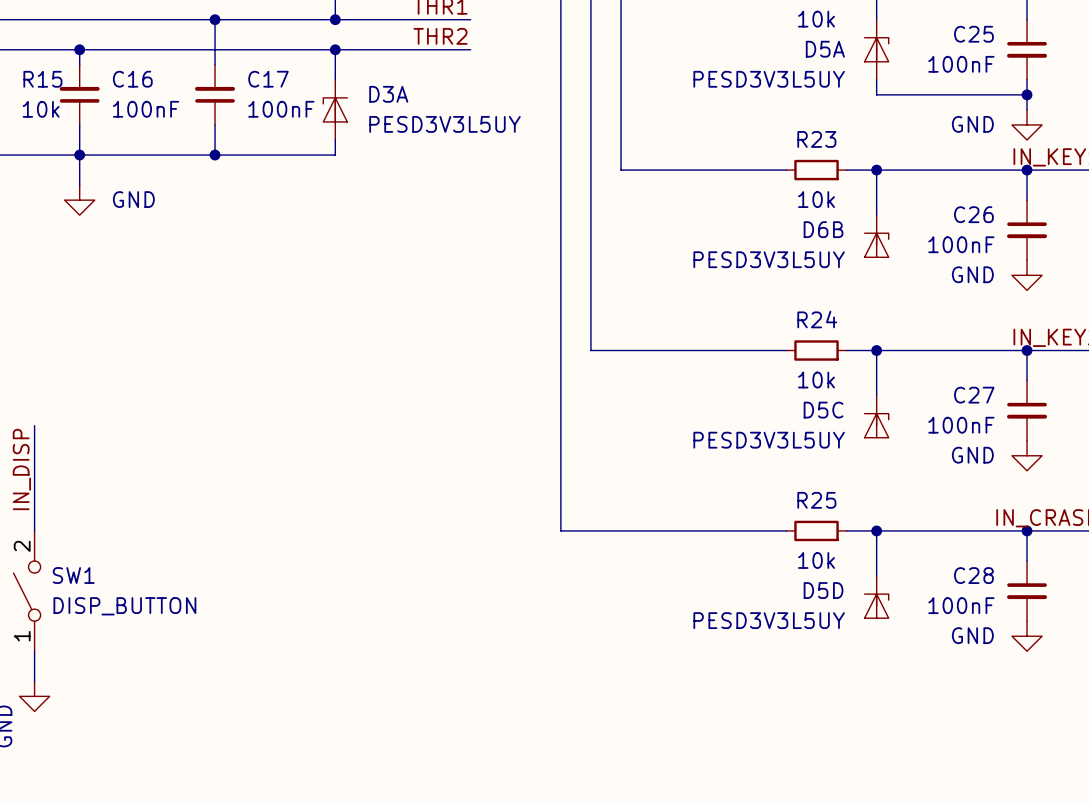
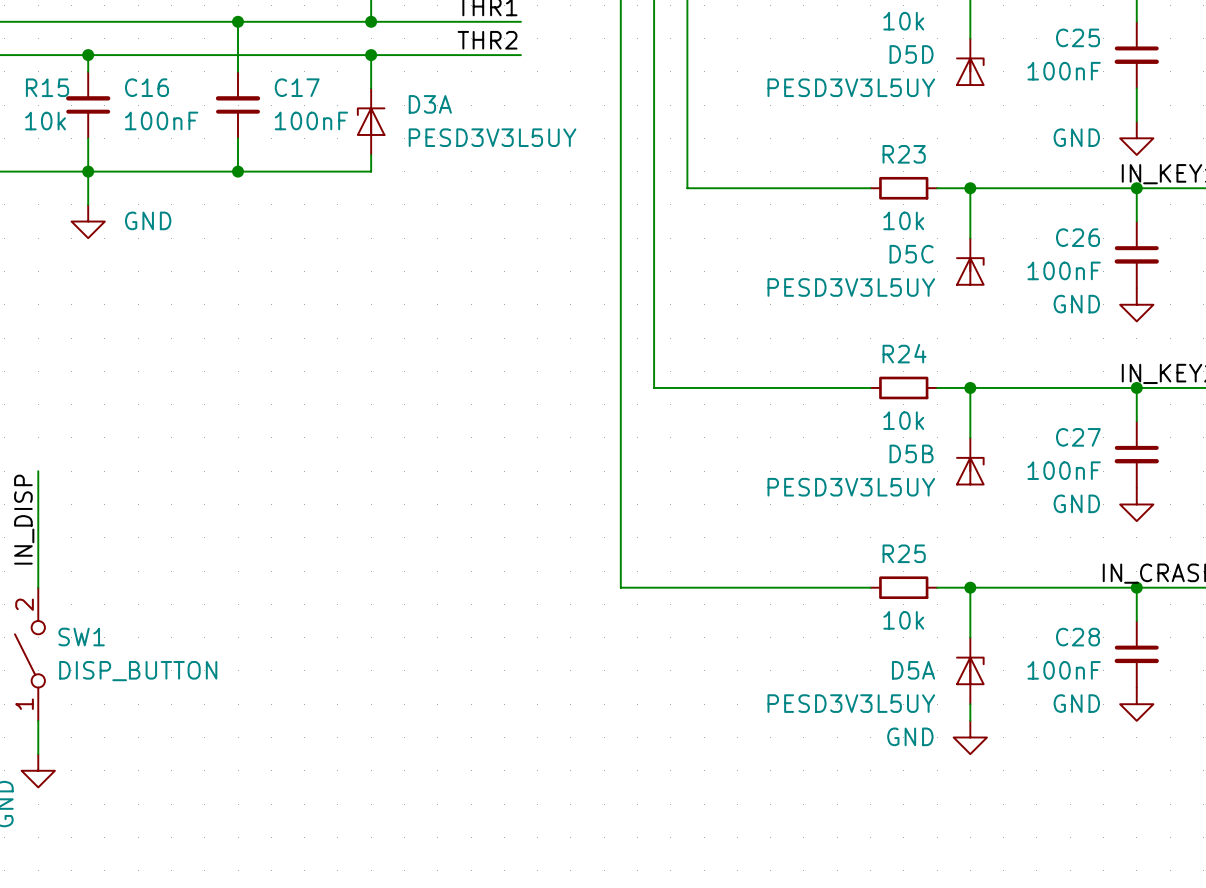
D5A position: (876, 49) -> (970, 670)
wire: (876, 79) (876, 94) (1027, 94) -> none
junction: (1027, 94) -> none
D6B name: D6B (823, 229) -> D5C (911, 254)
D5C name: D5C (823, 410) -> D5B (911, 453)
D5D position: (876, 597) -> (970, 61)
wire: none -> (970, 704) (970, 720)
power symbol: none -> GND (970, 737)

